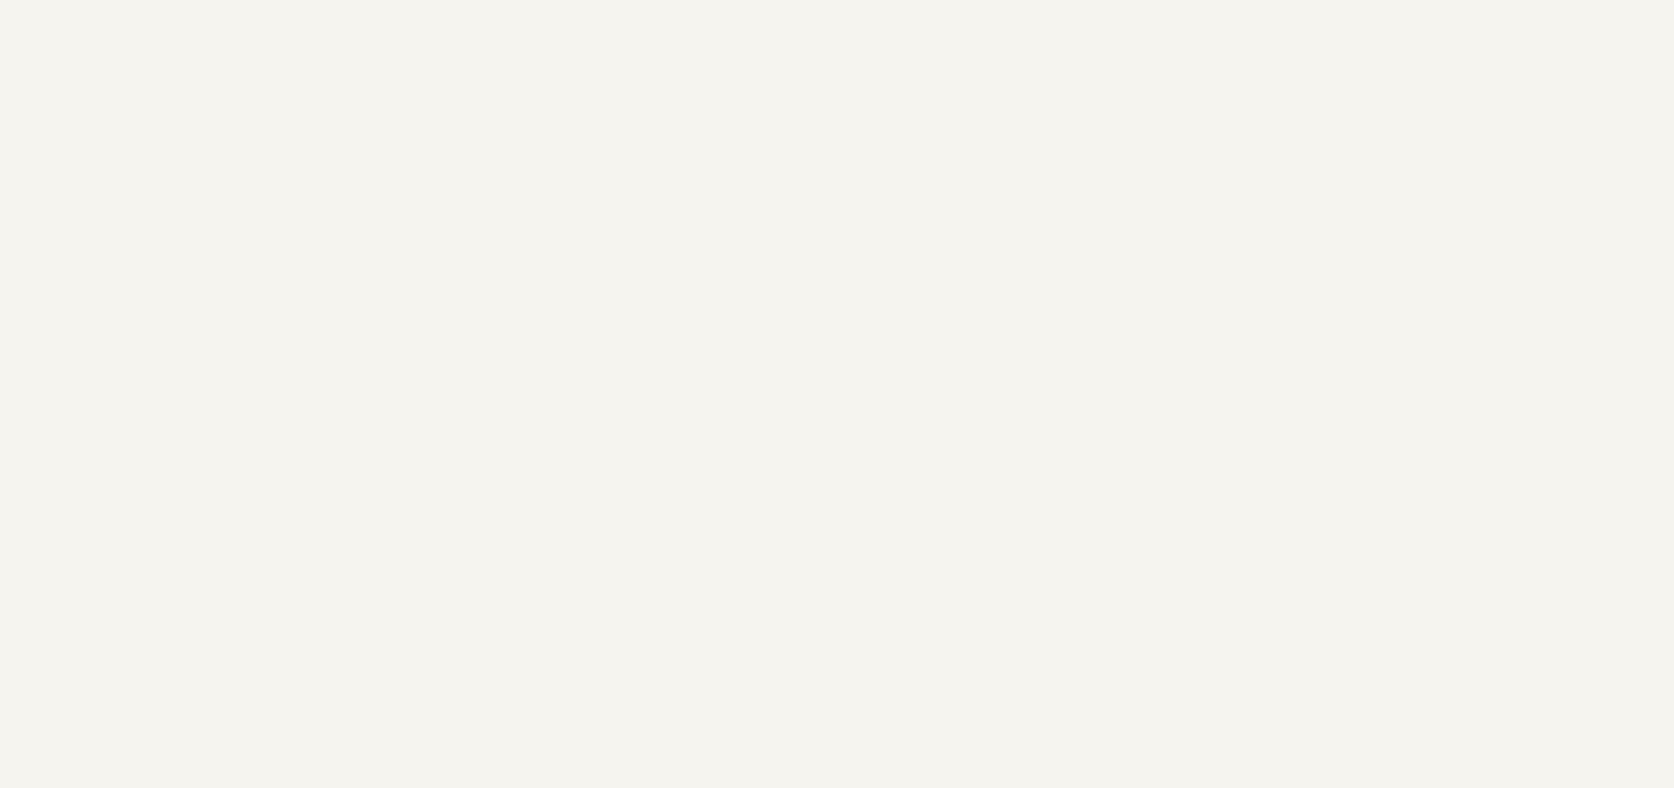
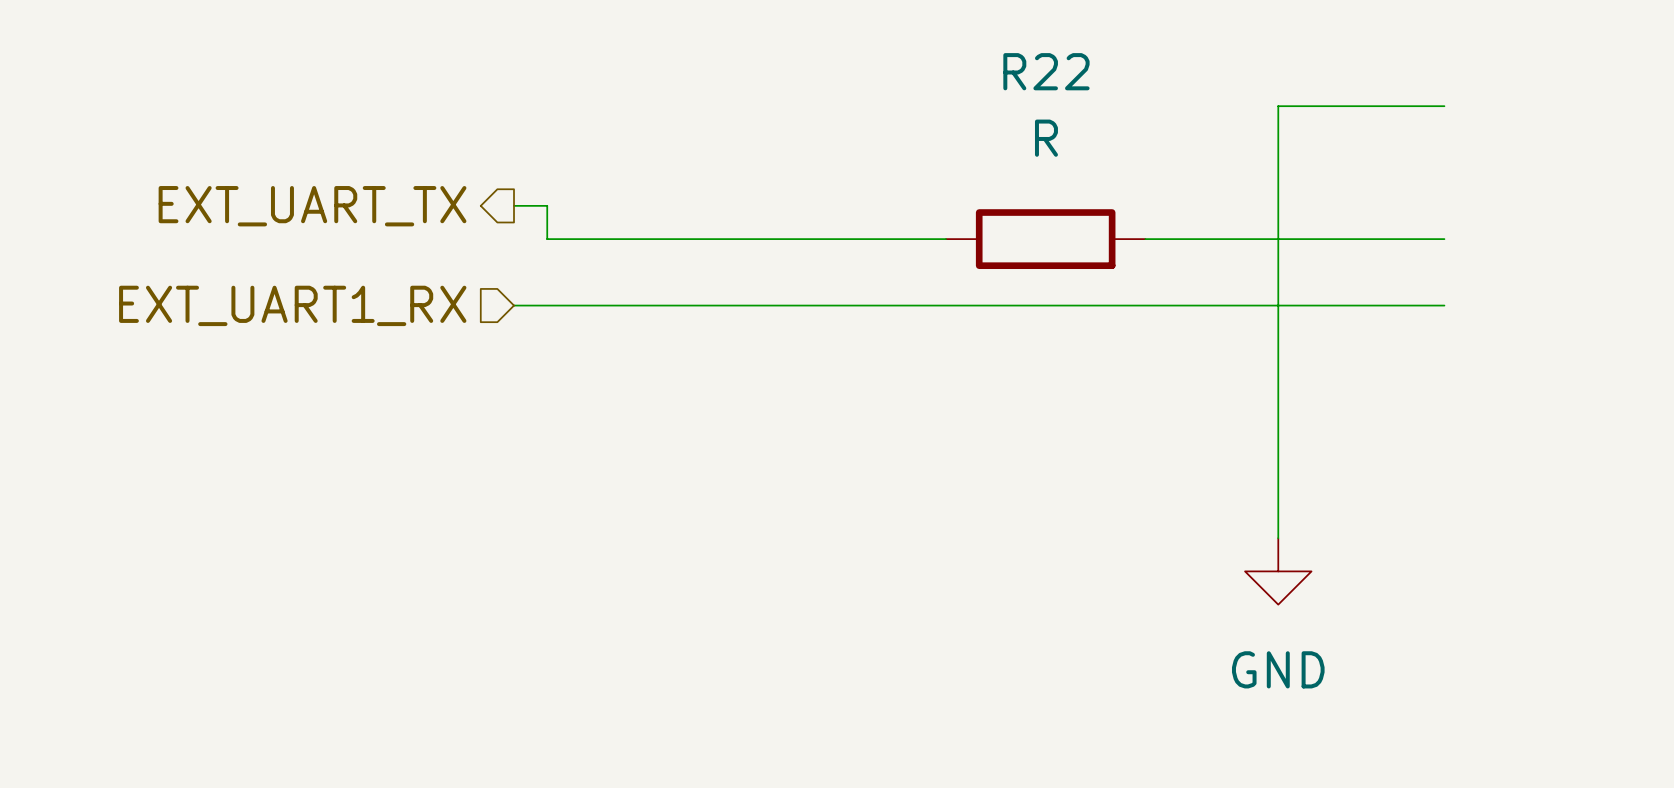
wire: none -> (1444, 106) (1278, 106) (1278, 538)
wire: none -> (514, 205) (547, 205) (547, 239) (945, 239)
hierarchical label: none -> EXT_UART_TX (312, 206)
R22: none -> R (1045, 239)
wire: none -> (1145, 239) (1444, 239)
hierarchical label: none -> EXT_UART1_RX (292, 305)
wire: none -> (514, 305) (1444, 305)
power symbol: none -> GND (1278, 571)

